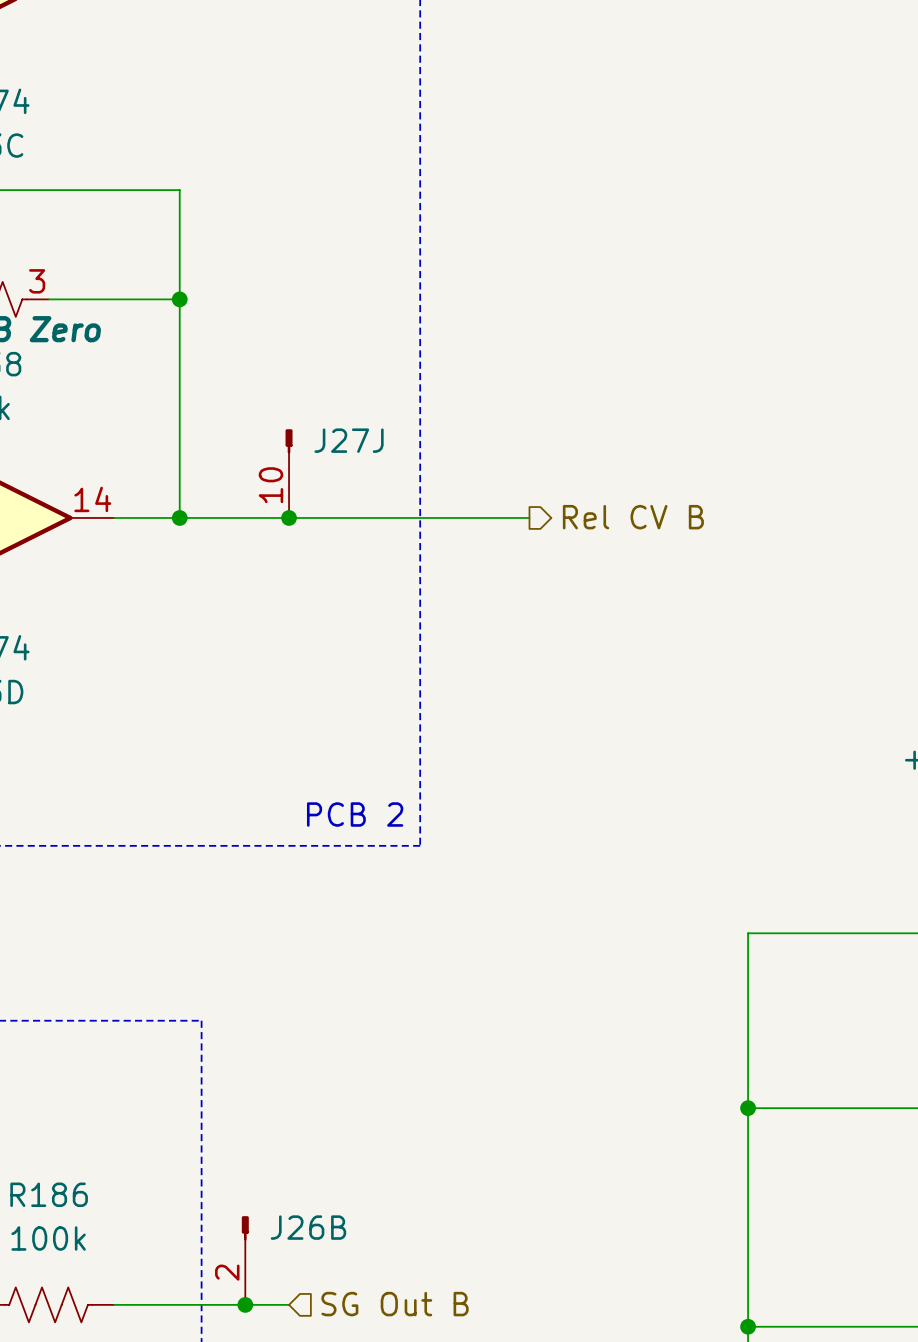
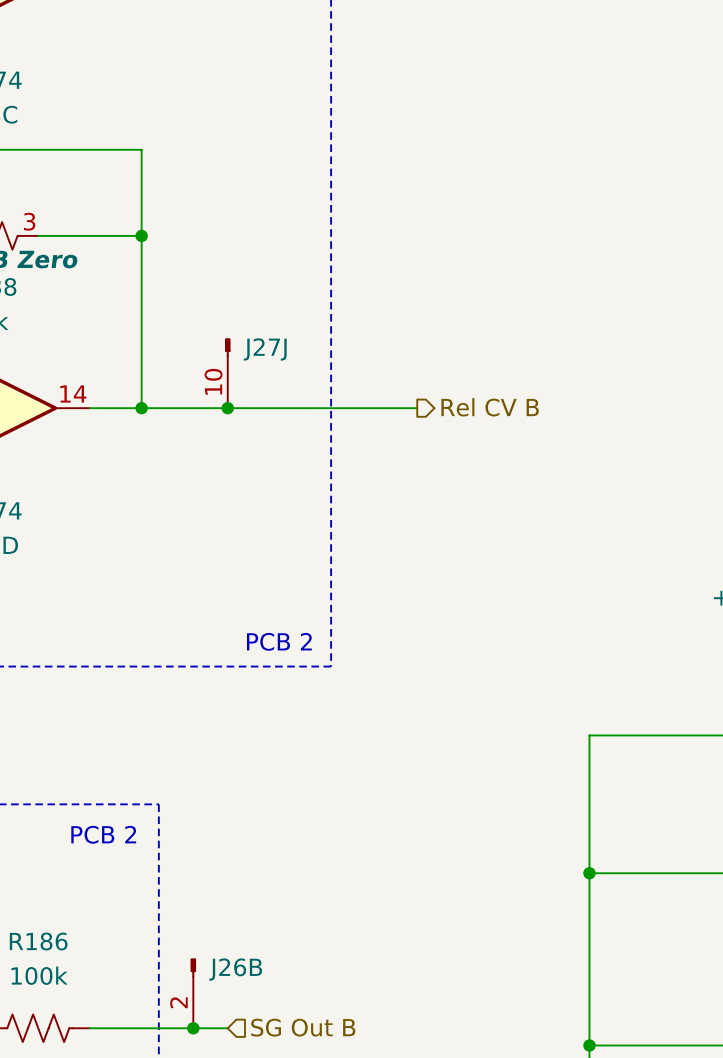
text: none -> PCB 2 (103, 834)

